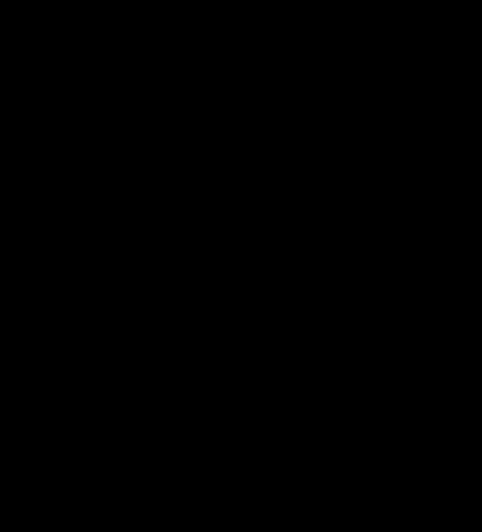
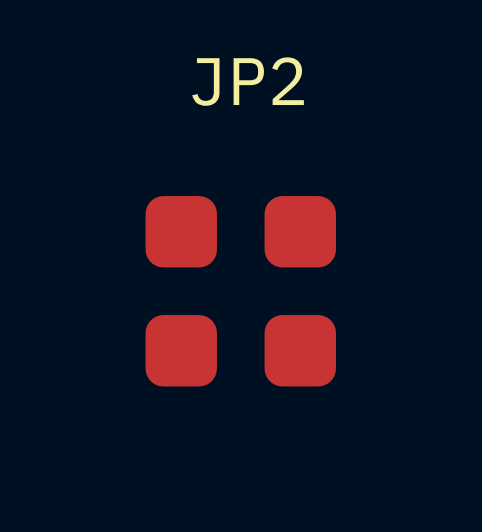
JP2: none -> (240, 291)

